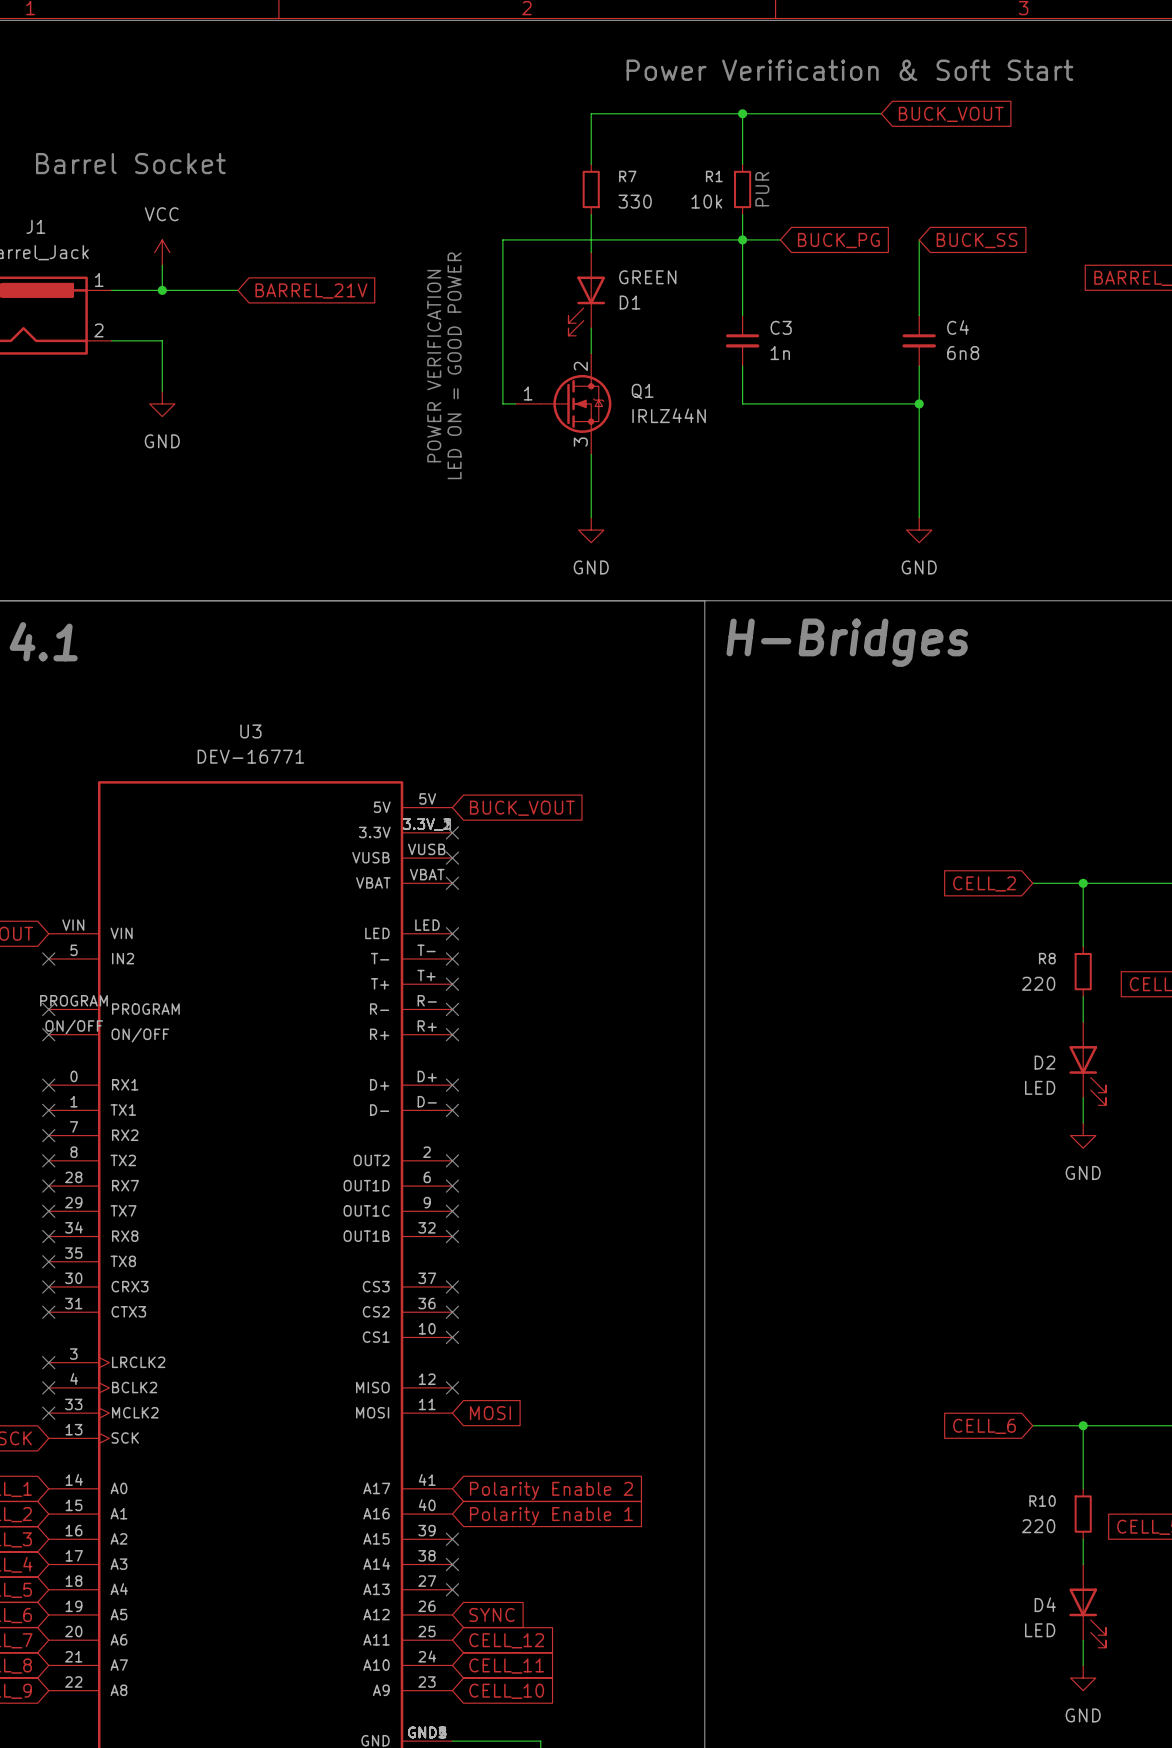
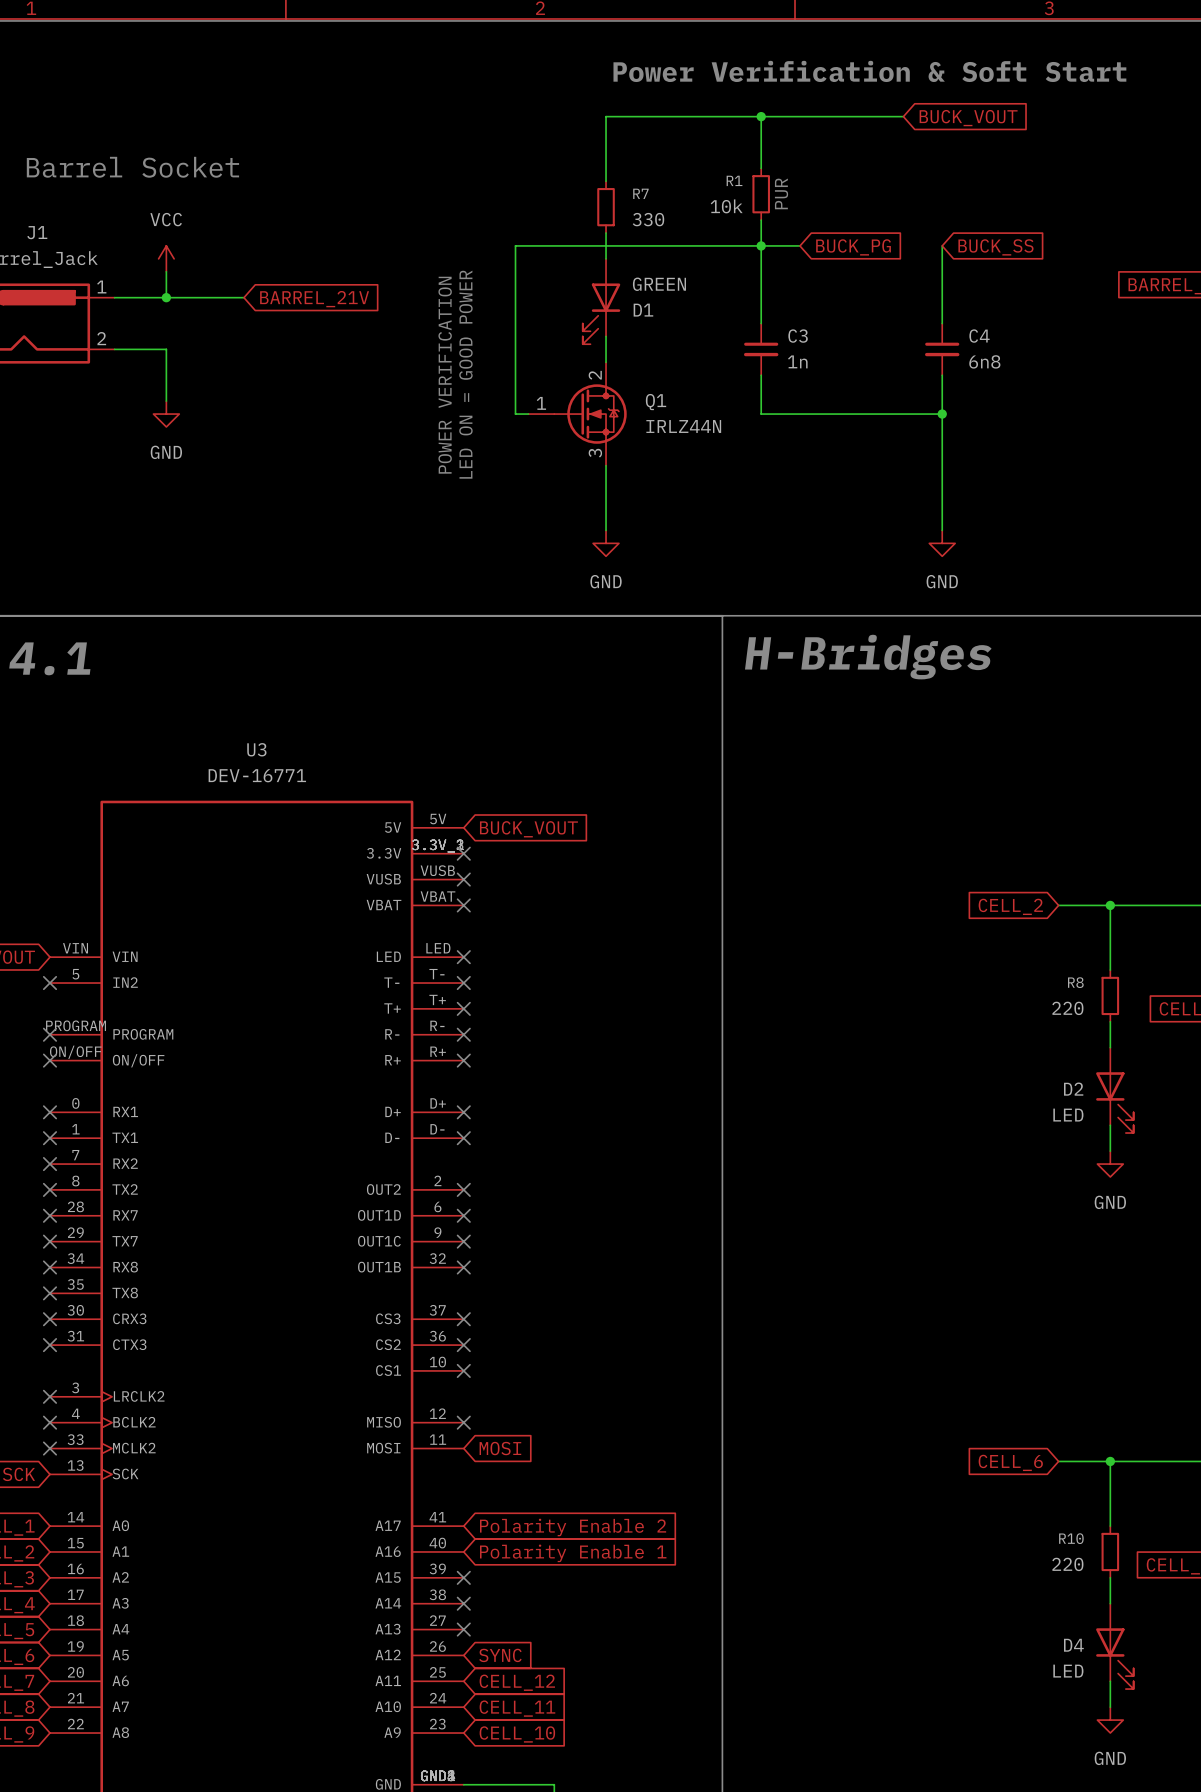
R7 position: (591, 189) -> (606, 207)

